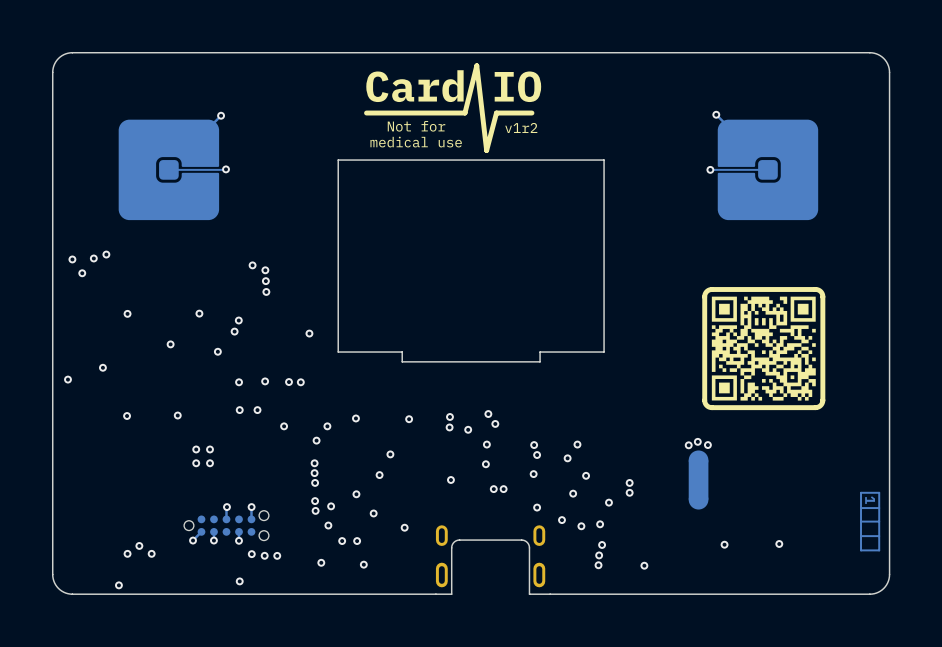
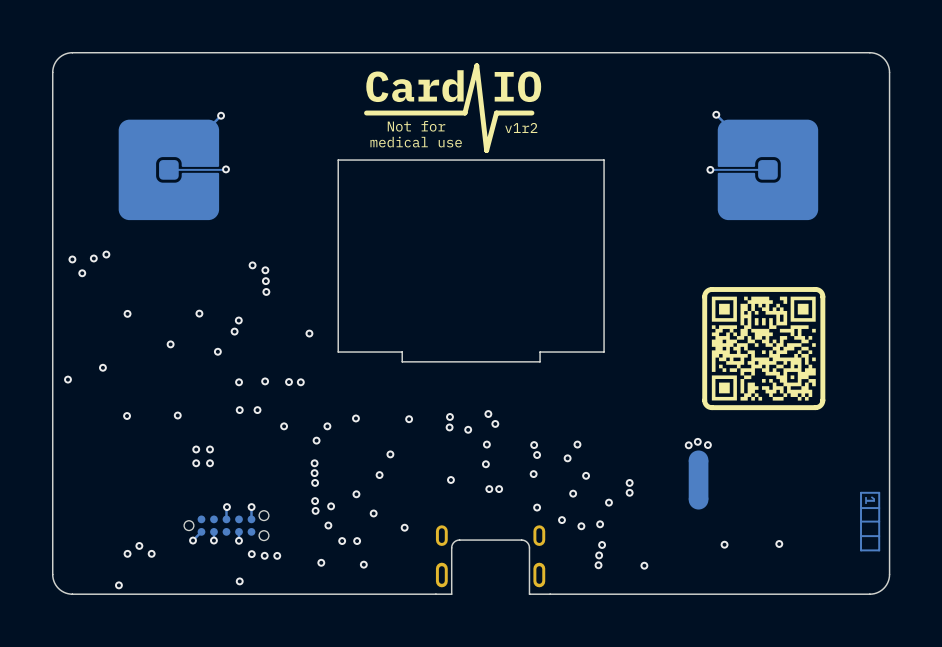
via: none -> (489, 489)
via: (493, 489) -> none
via: none -> (499, 489)
via: (503, 489) -> none

